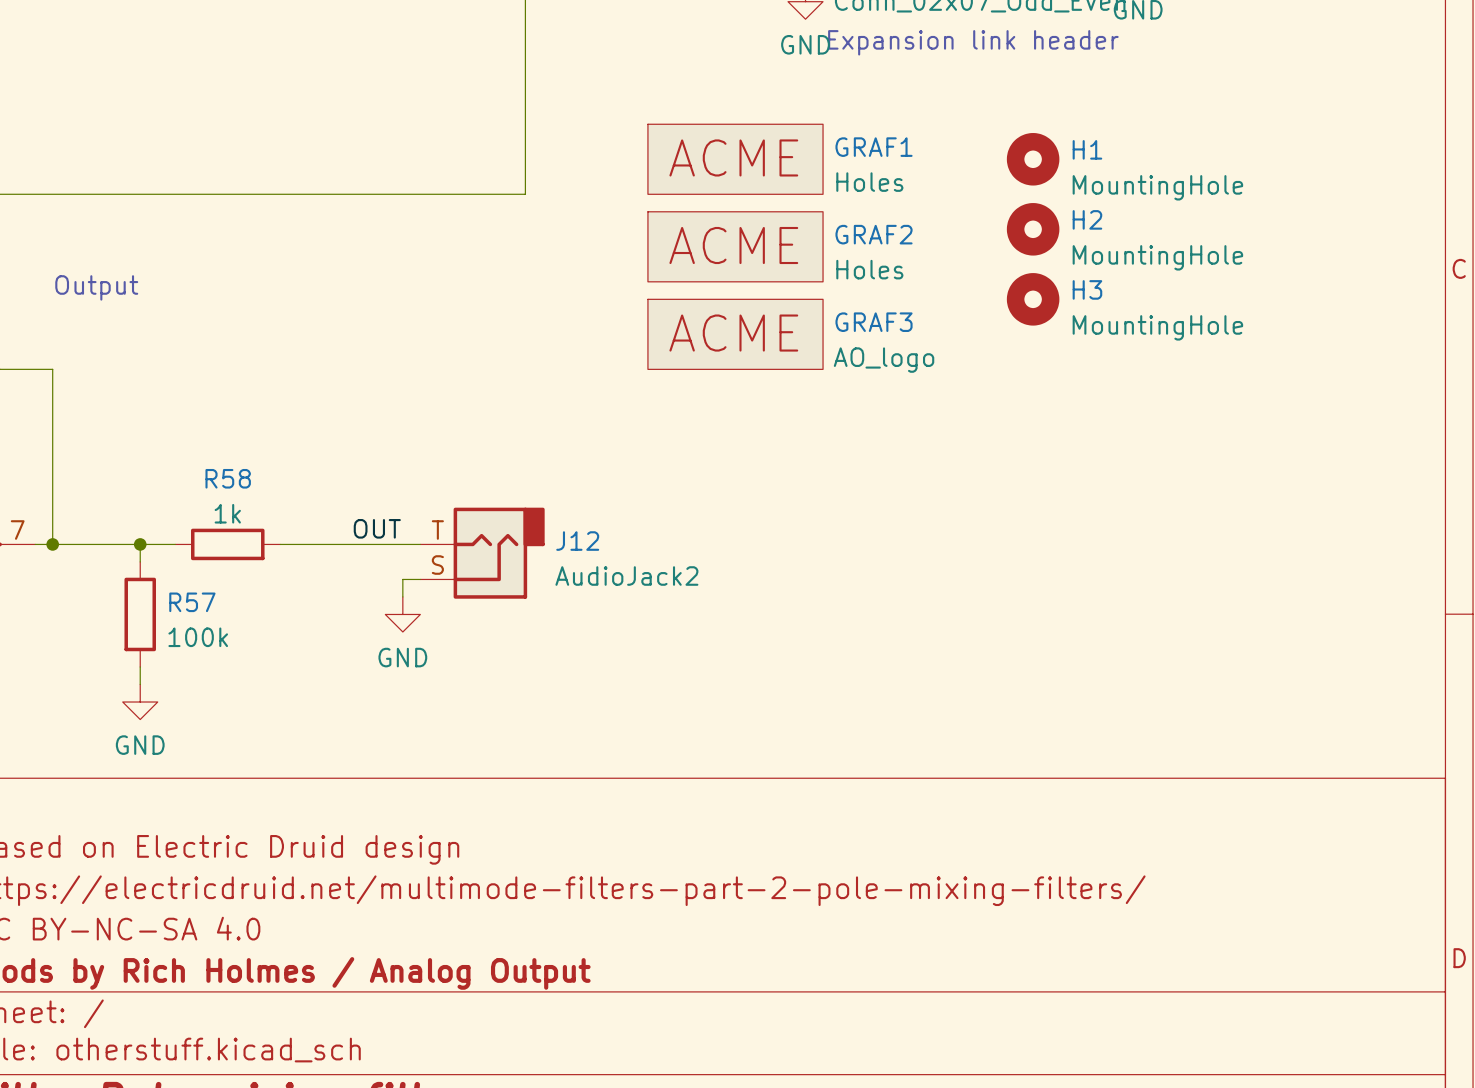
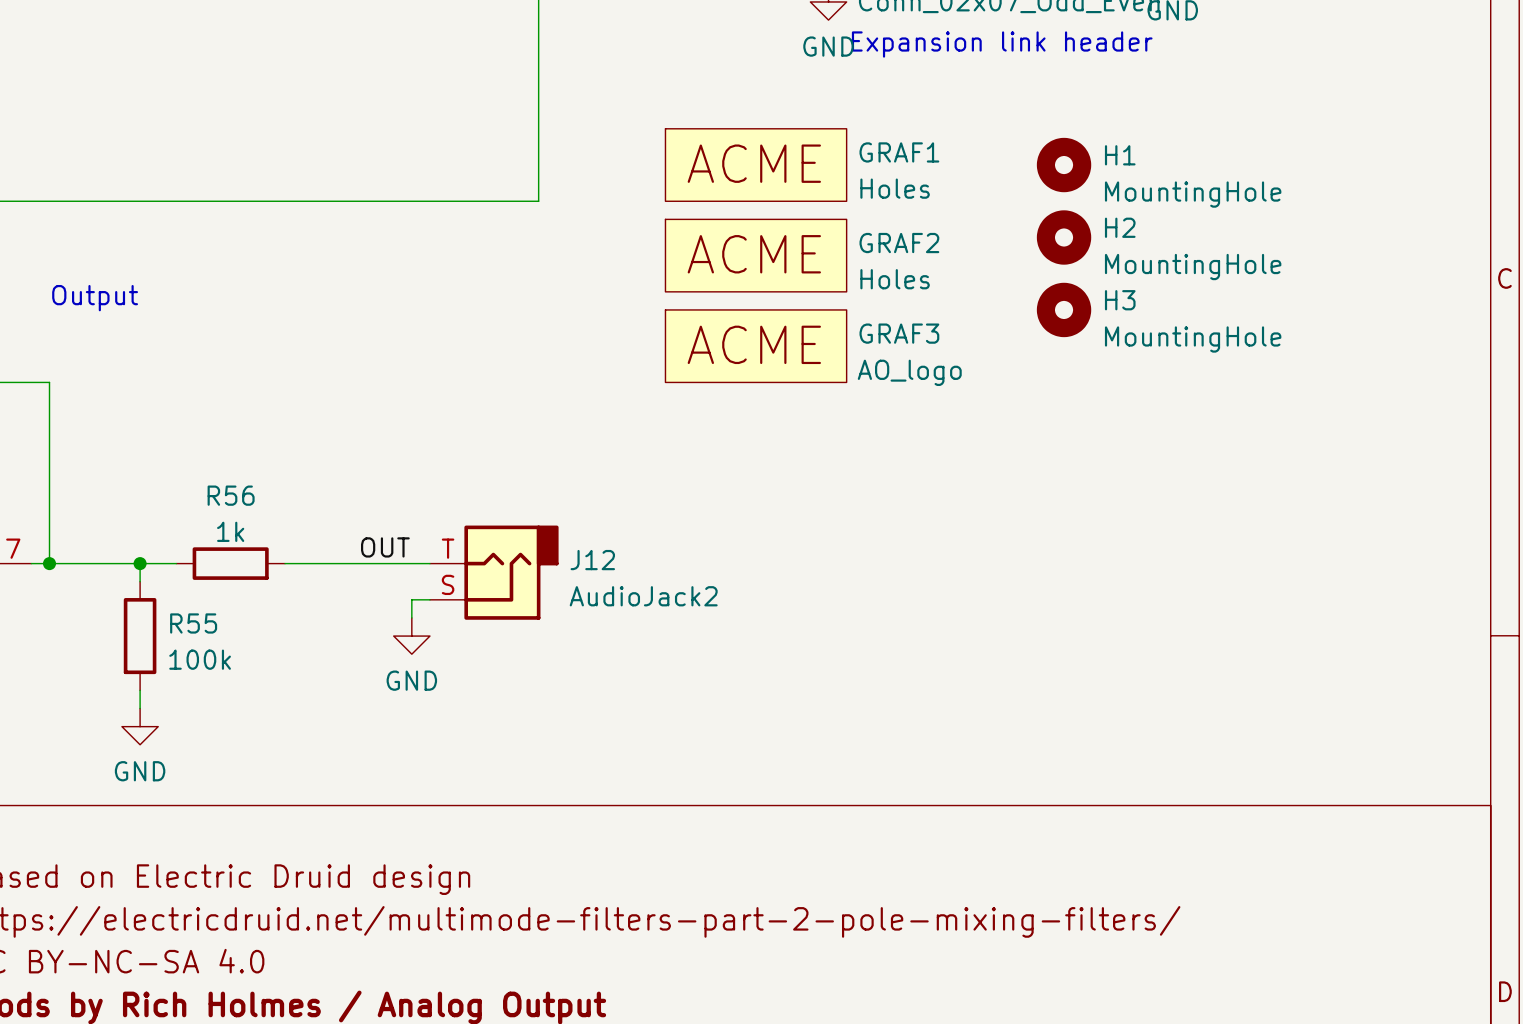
R58 name: R58 (228, 478) -> R56 (231, 495)
R57 name: R57 (192, 602) -> R55 (193, 623)

